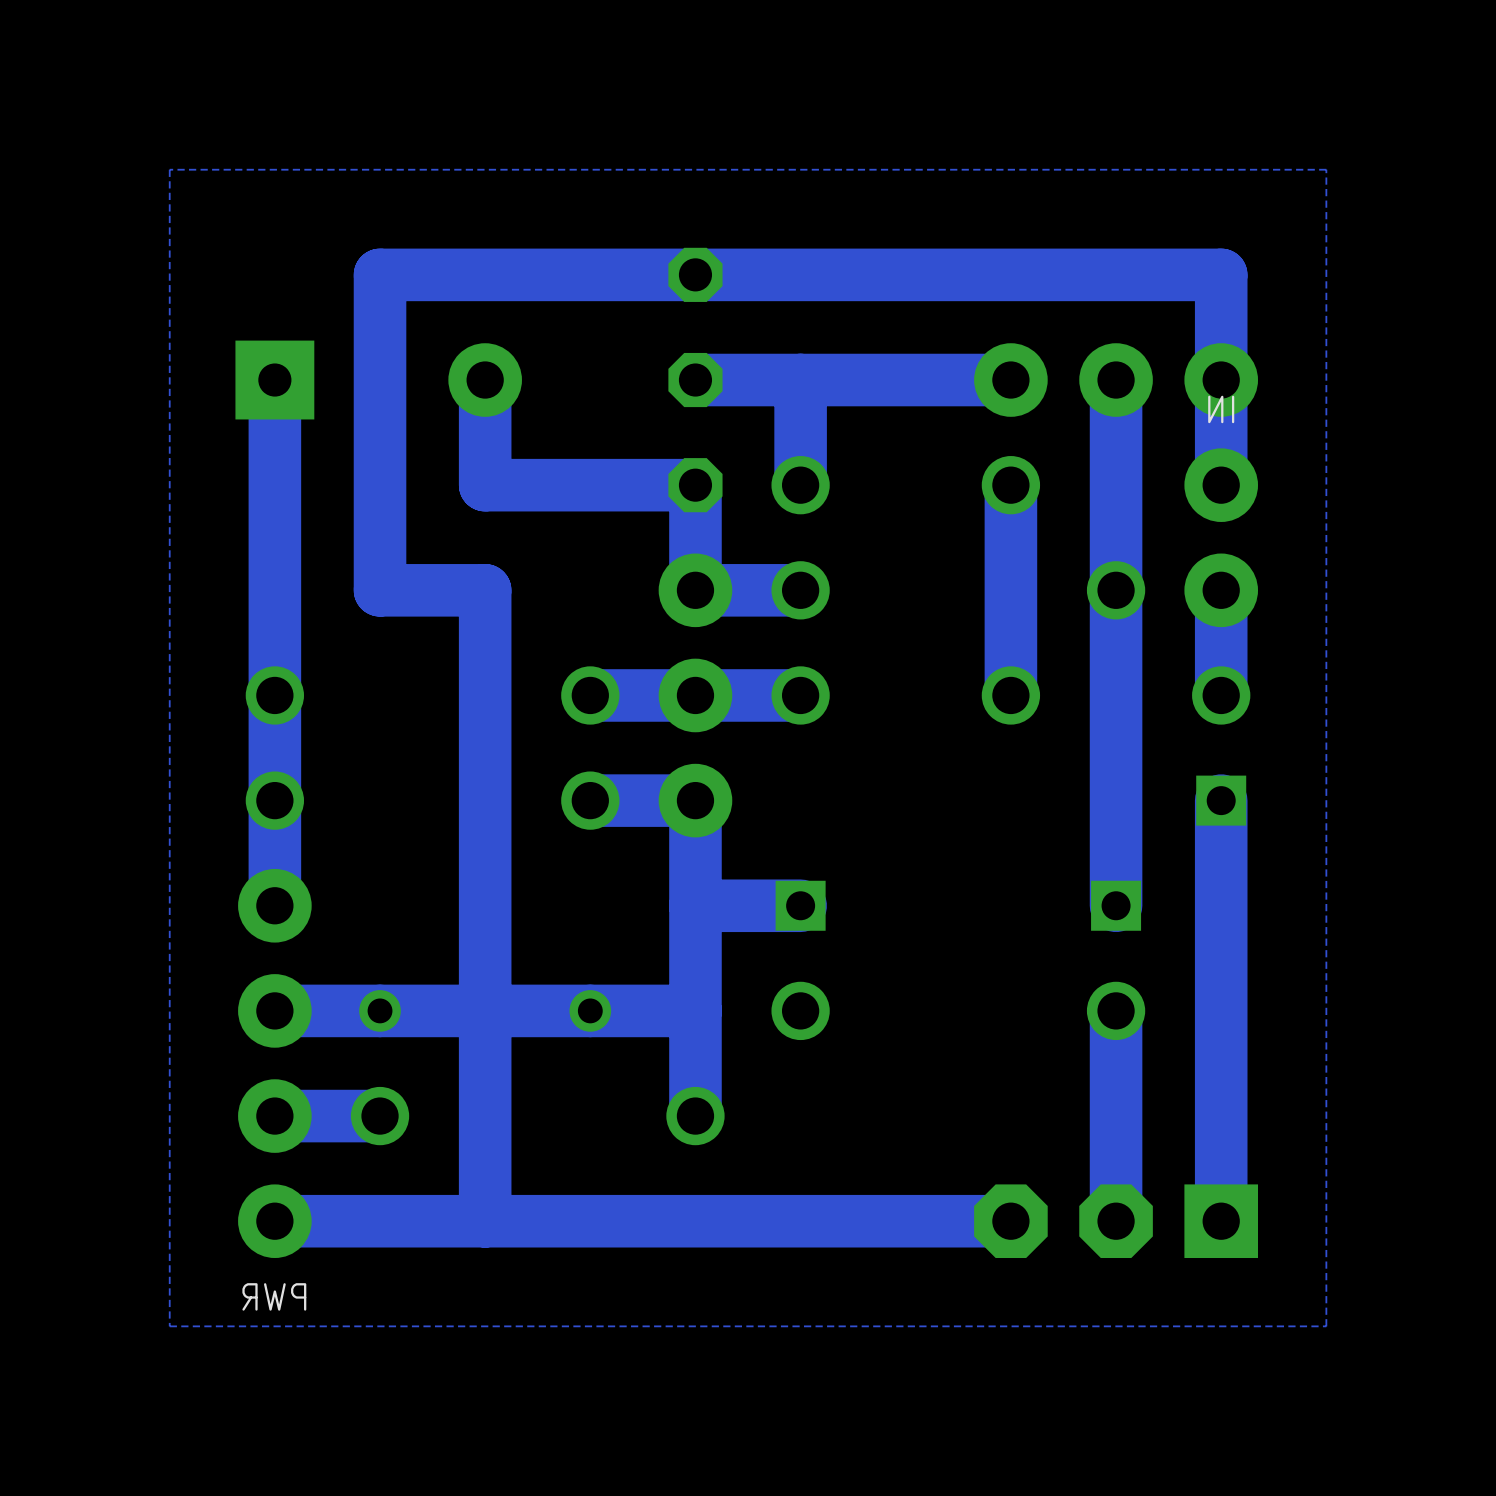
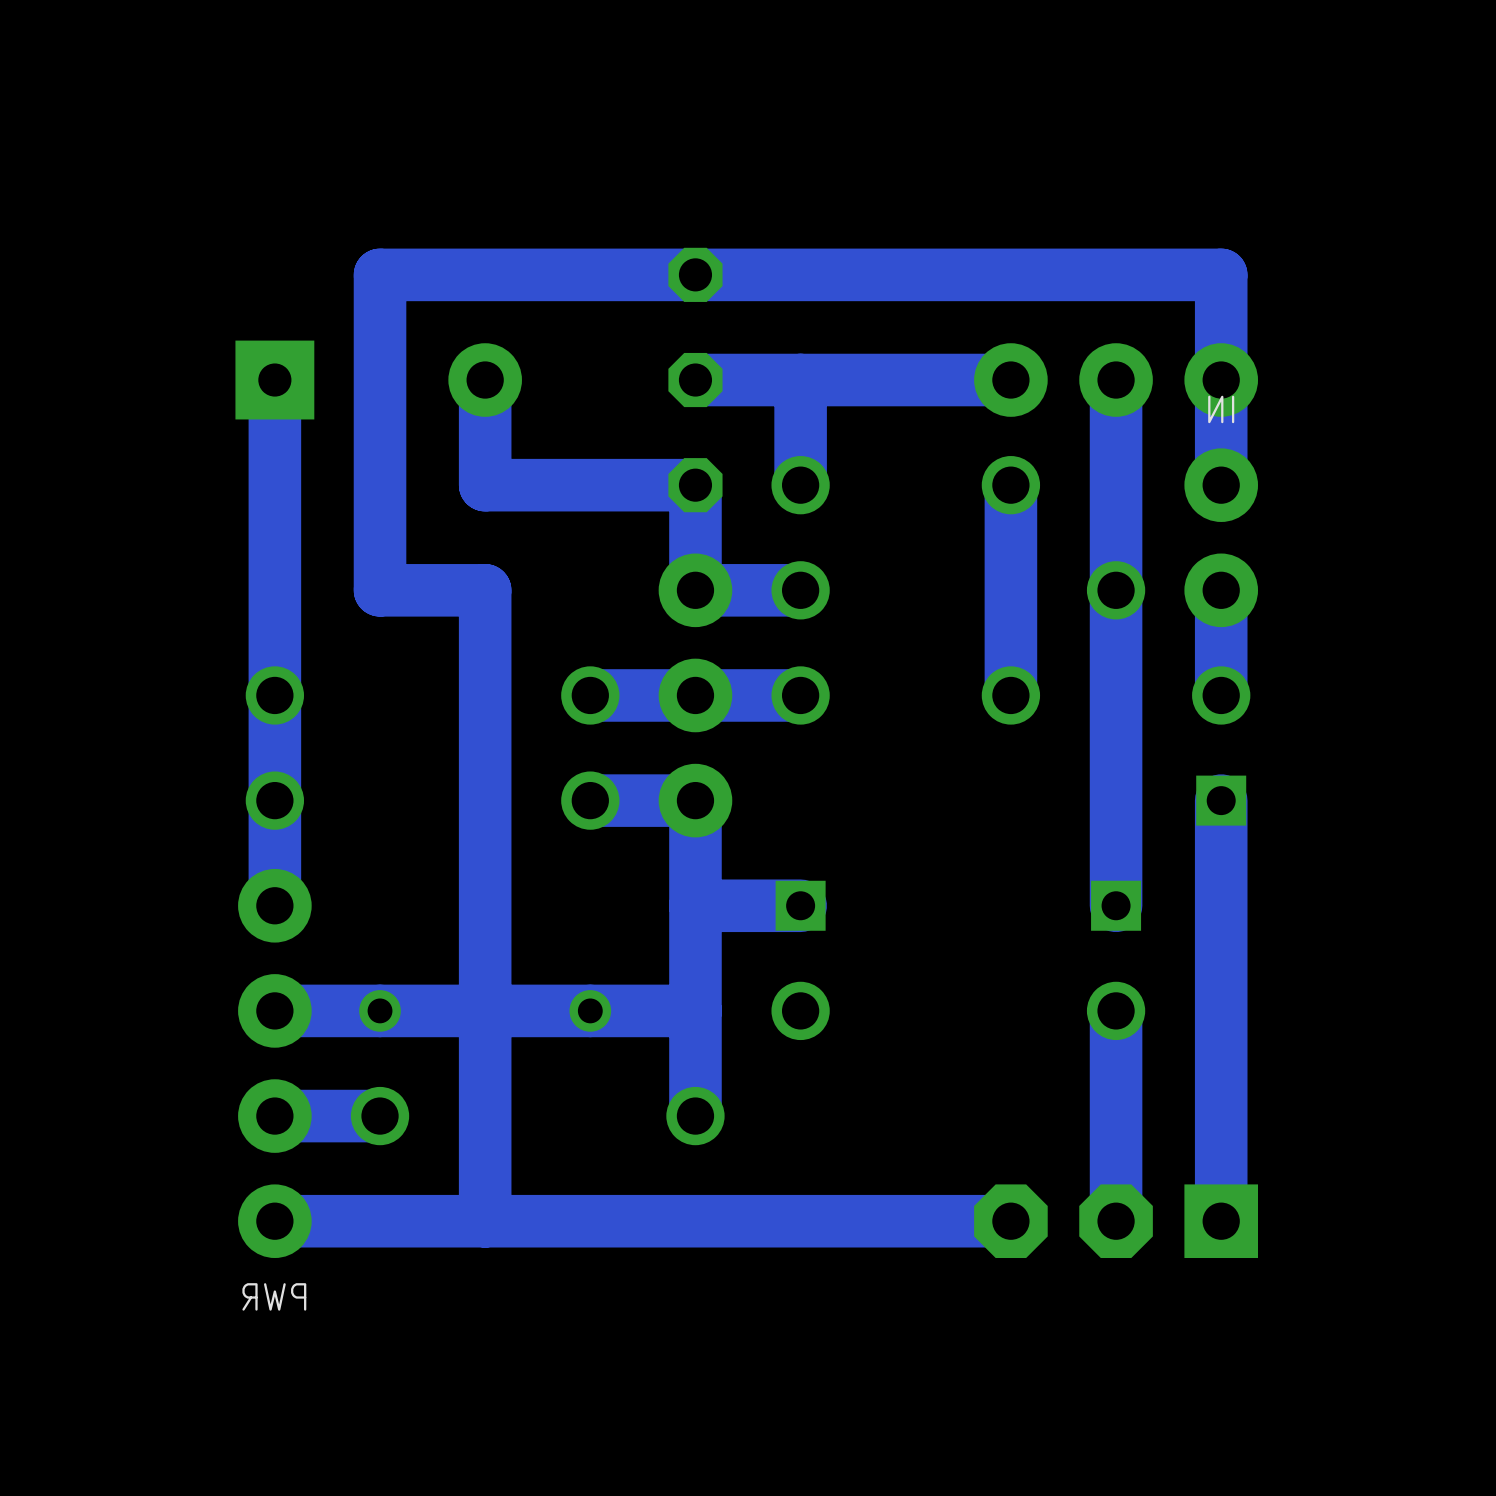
zone outline: (1326, 169) (1326, 1326) (169, 1326) (169, 169) (1326, 169) -> none

